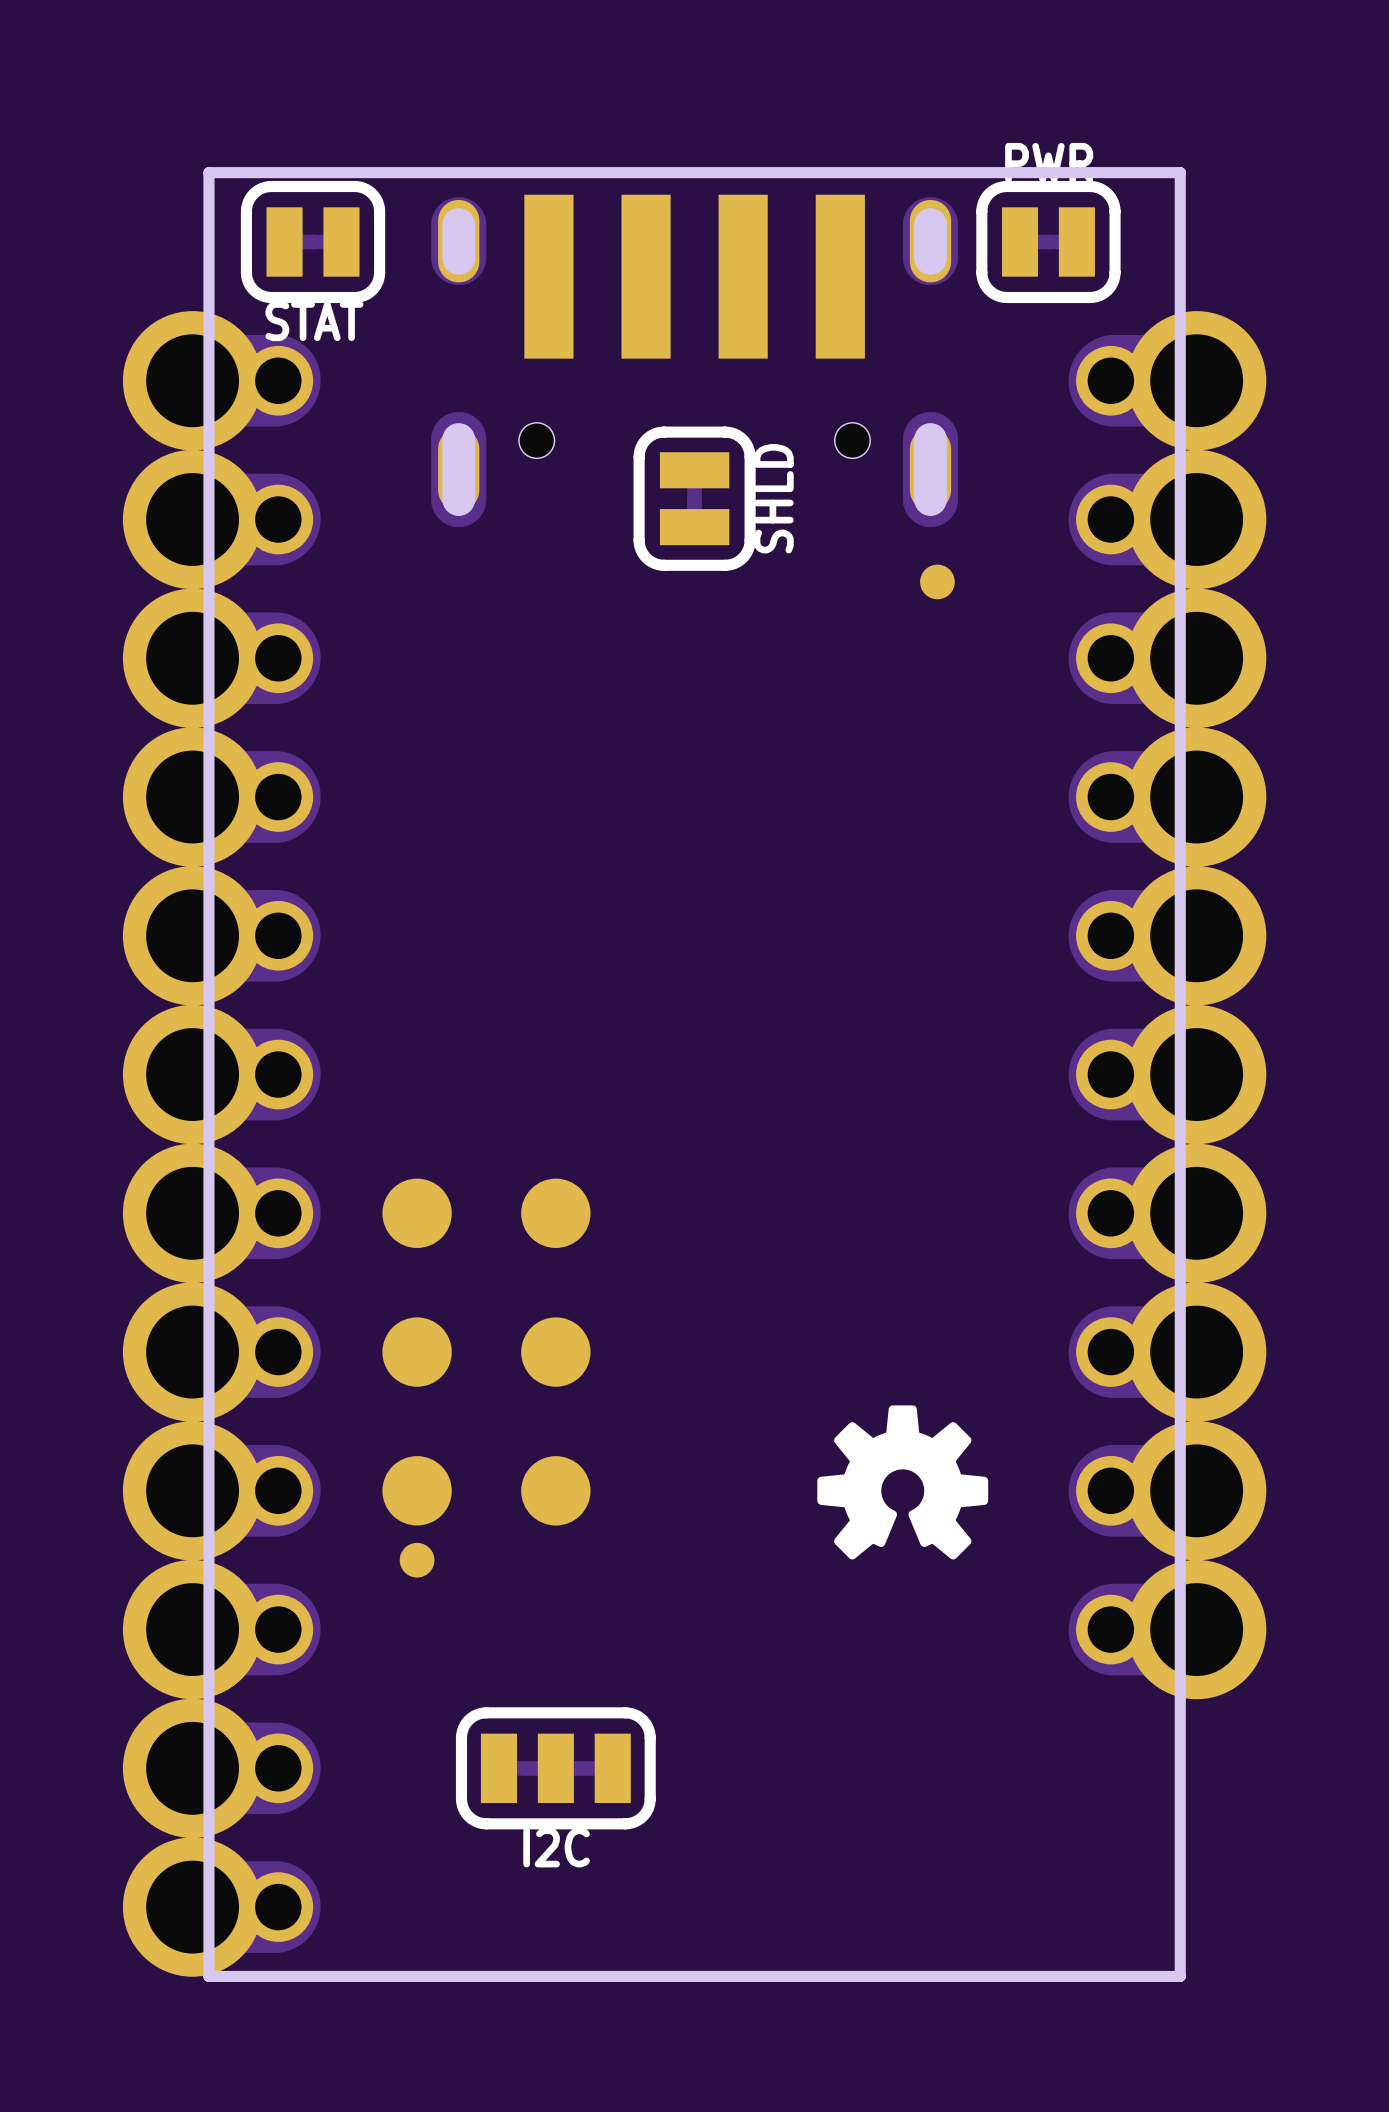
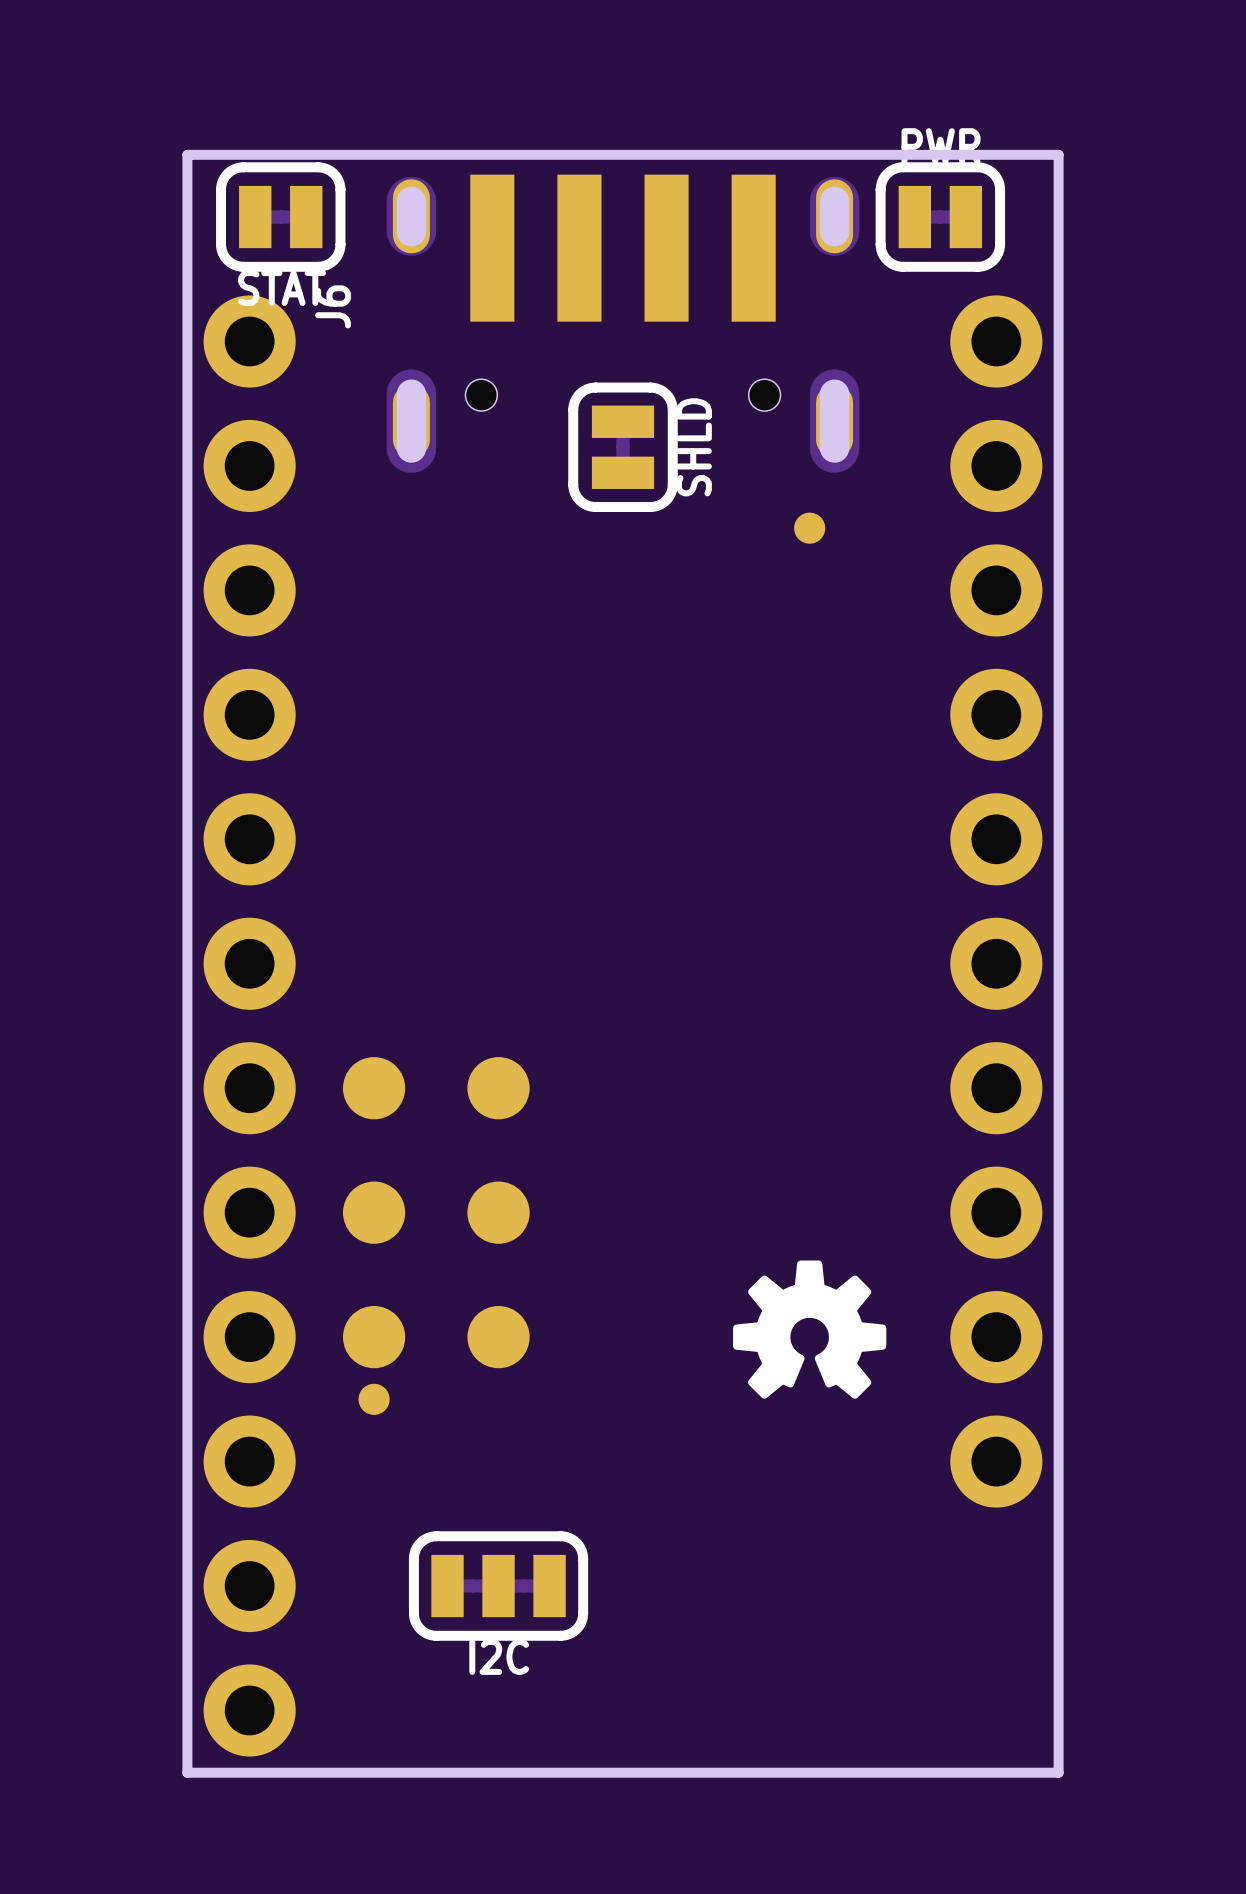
part position: (937, 581) -> (809, 528)
part: none -> (996, 901)
part: (1167, 1005) -> none
part: (221, 1143) -> none
J6: none -> (249, 1025)

